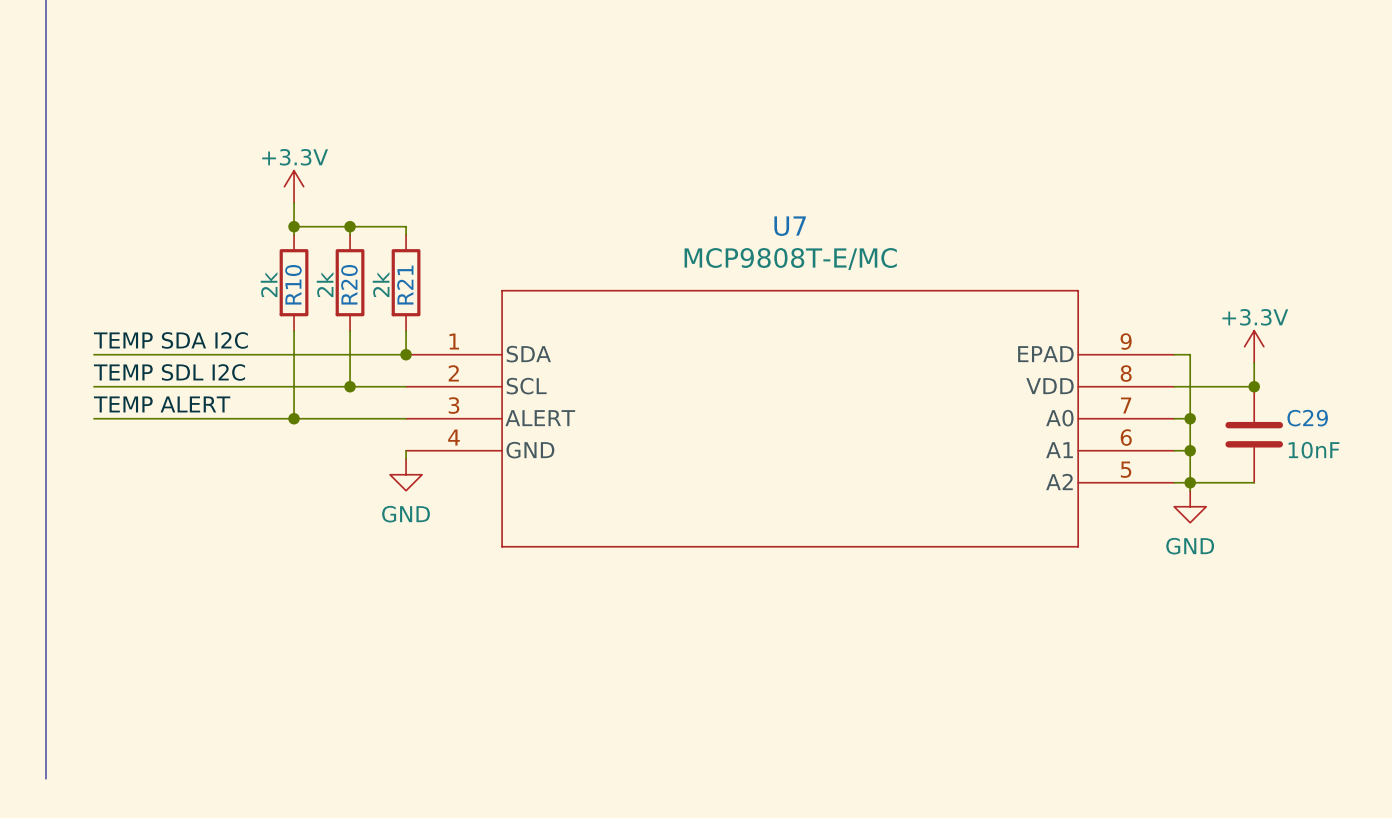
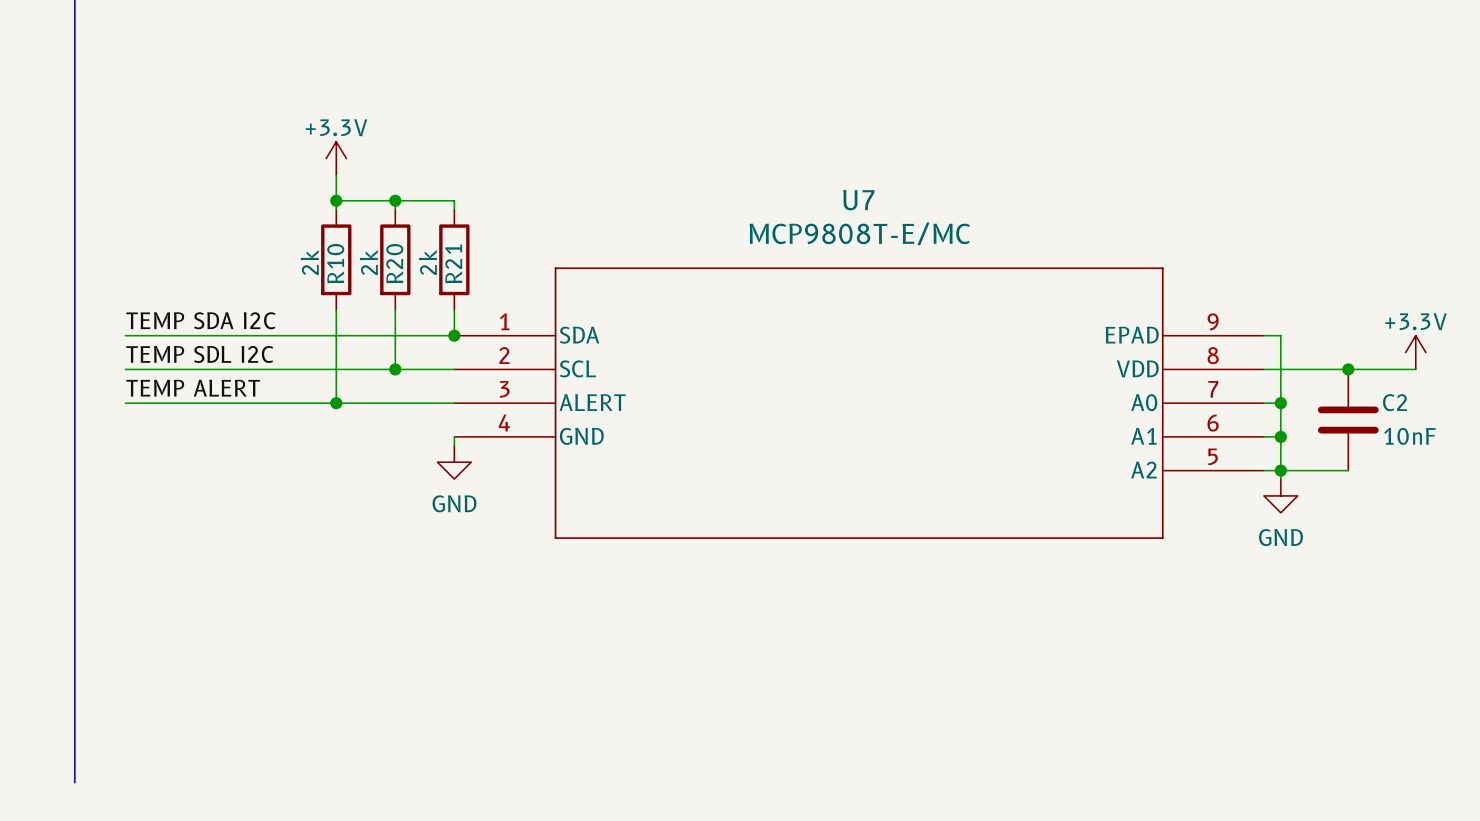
power symbol position: +3.3V (1254, 346) -> +3.3V (1415, 352)
wire: (1254, 362) (1254, 386) -> (1415, 369) (1348, 369)
C29 name: C29 (1307, 418) -> C2 (1395, 402)

